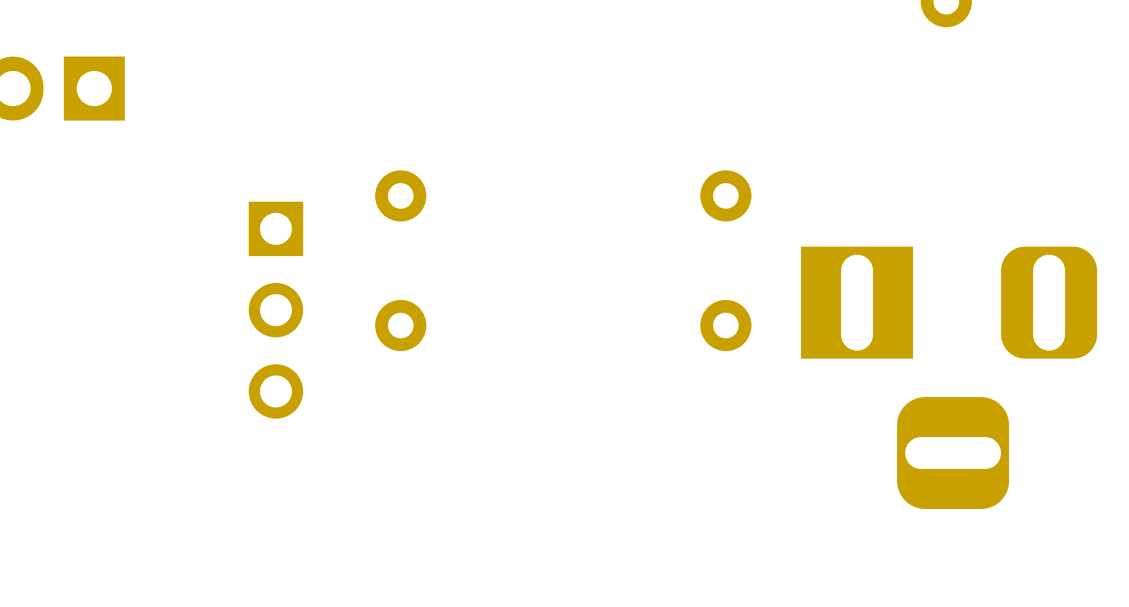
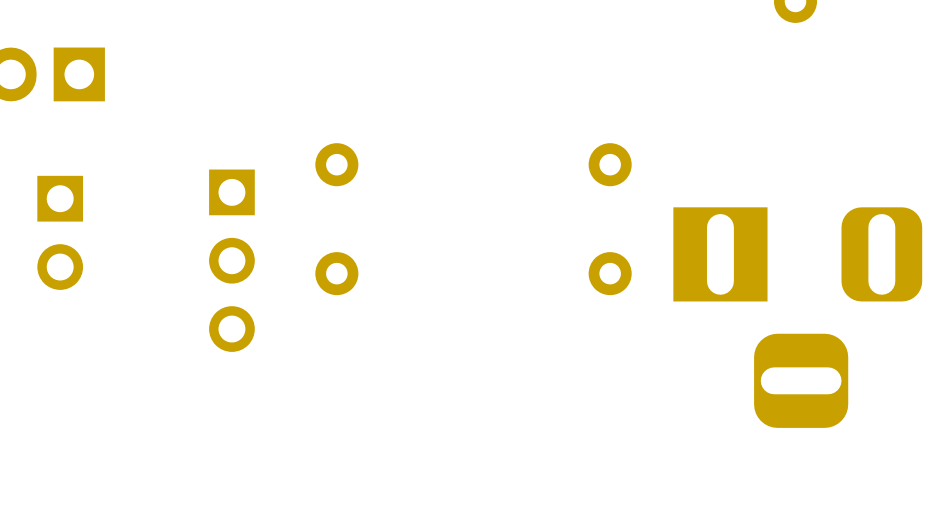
part: none -> (60, 232)

